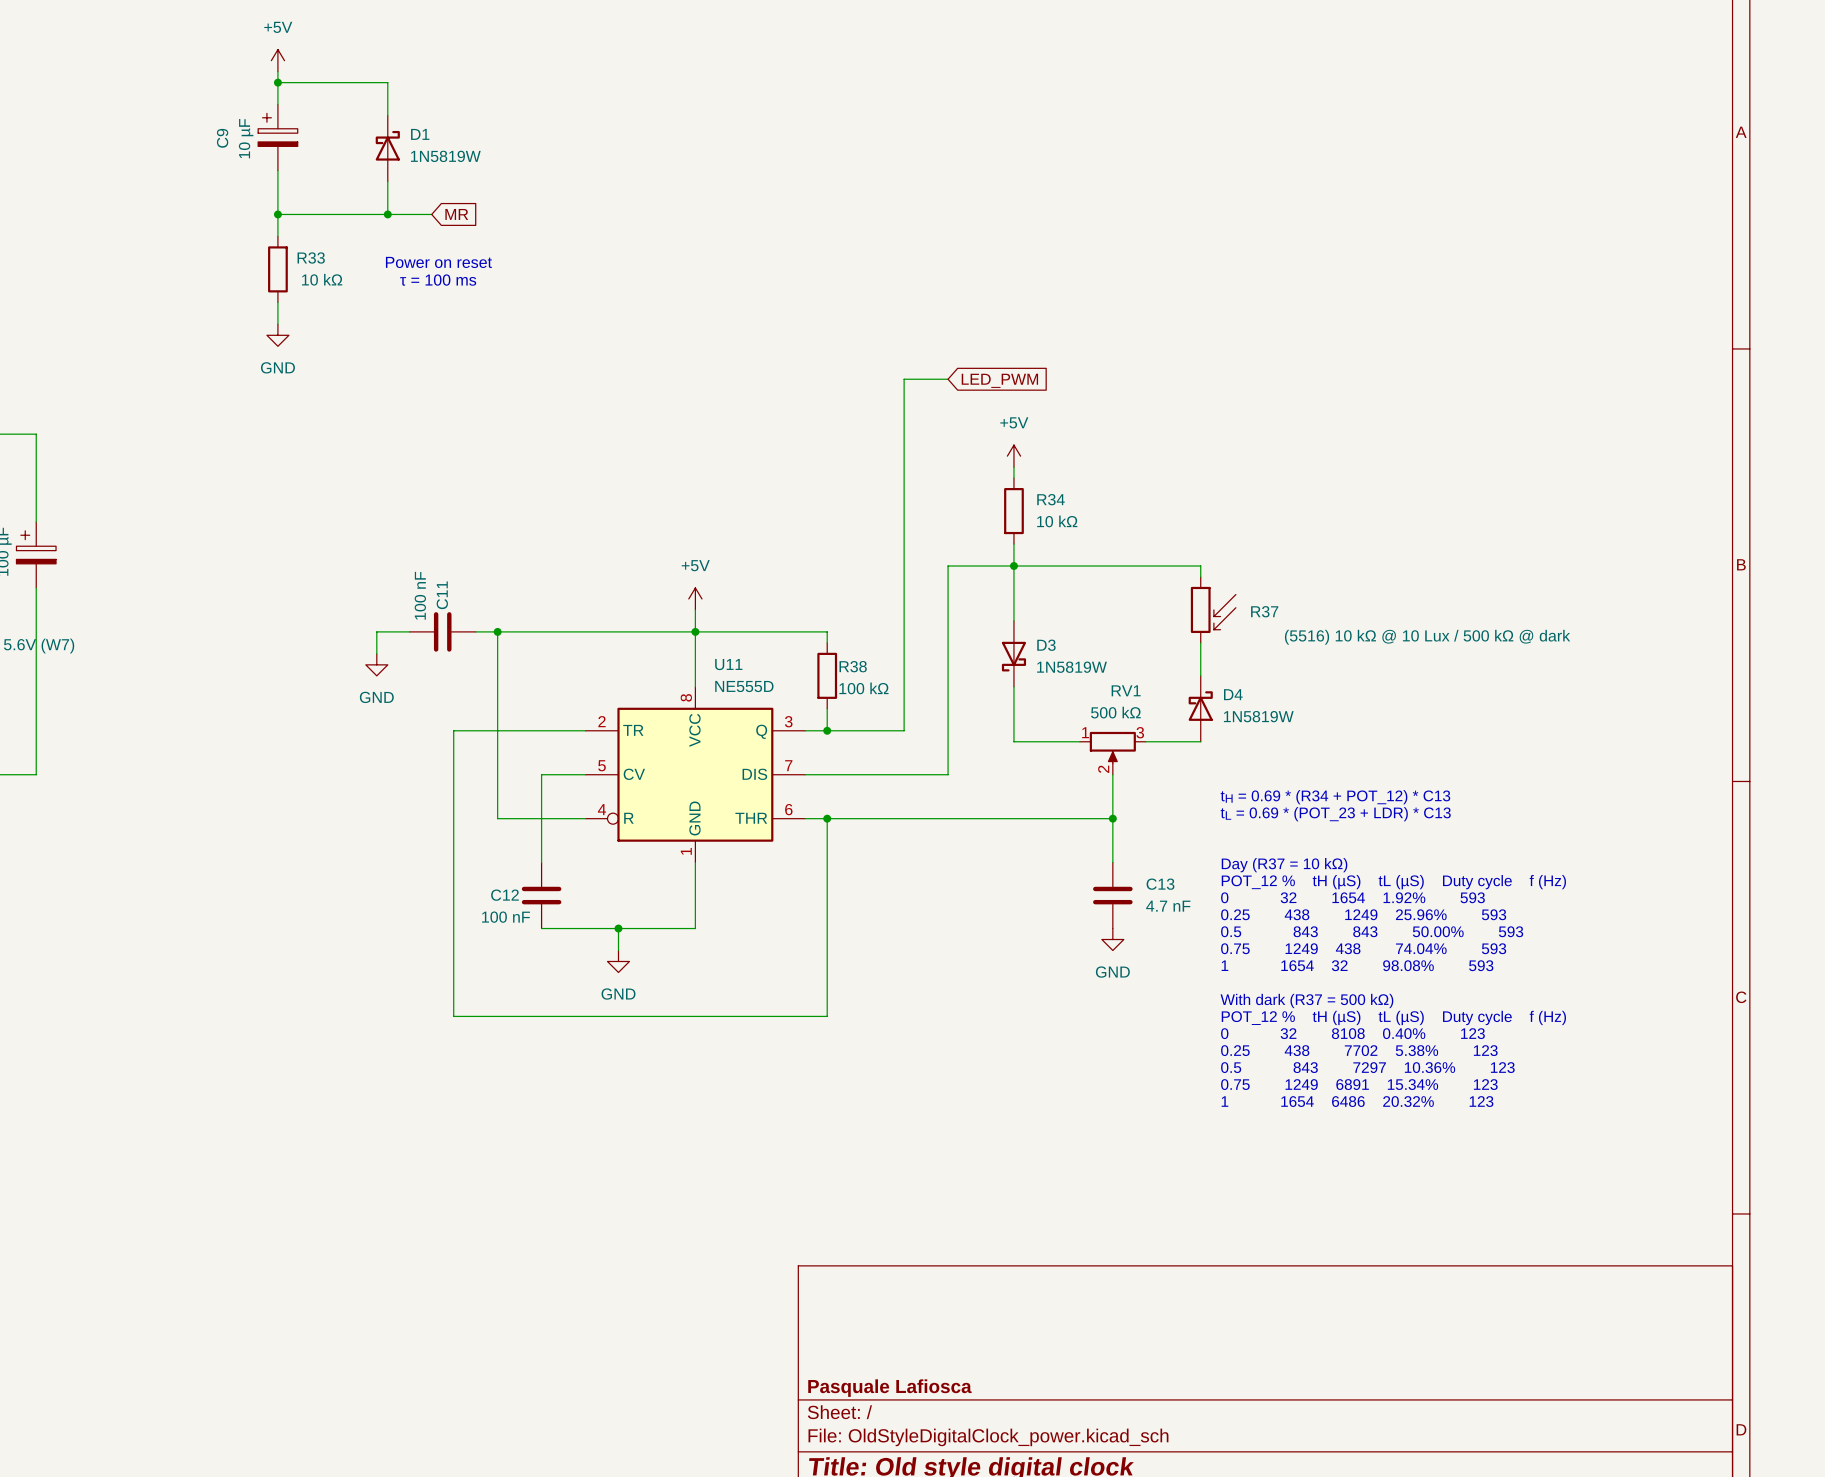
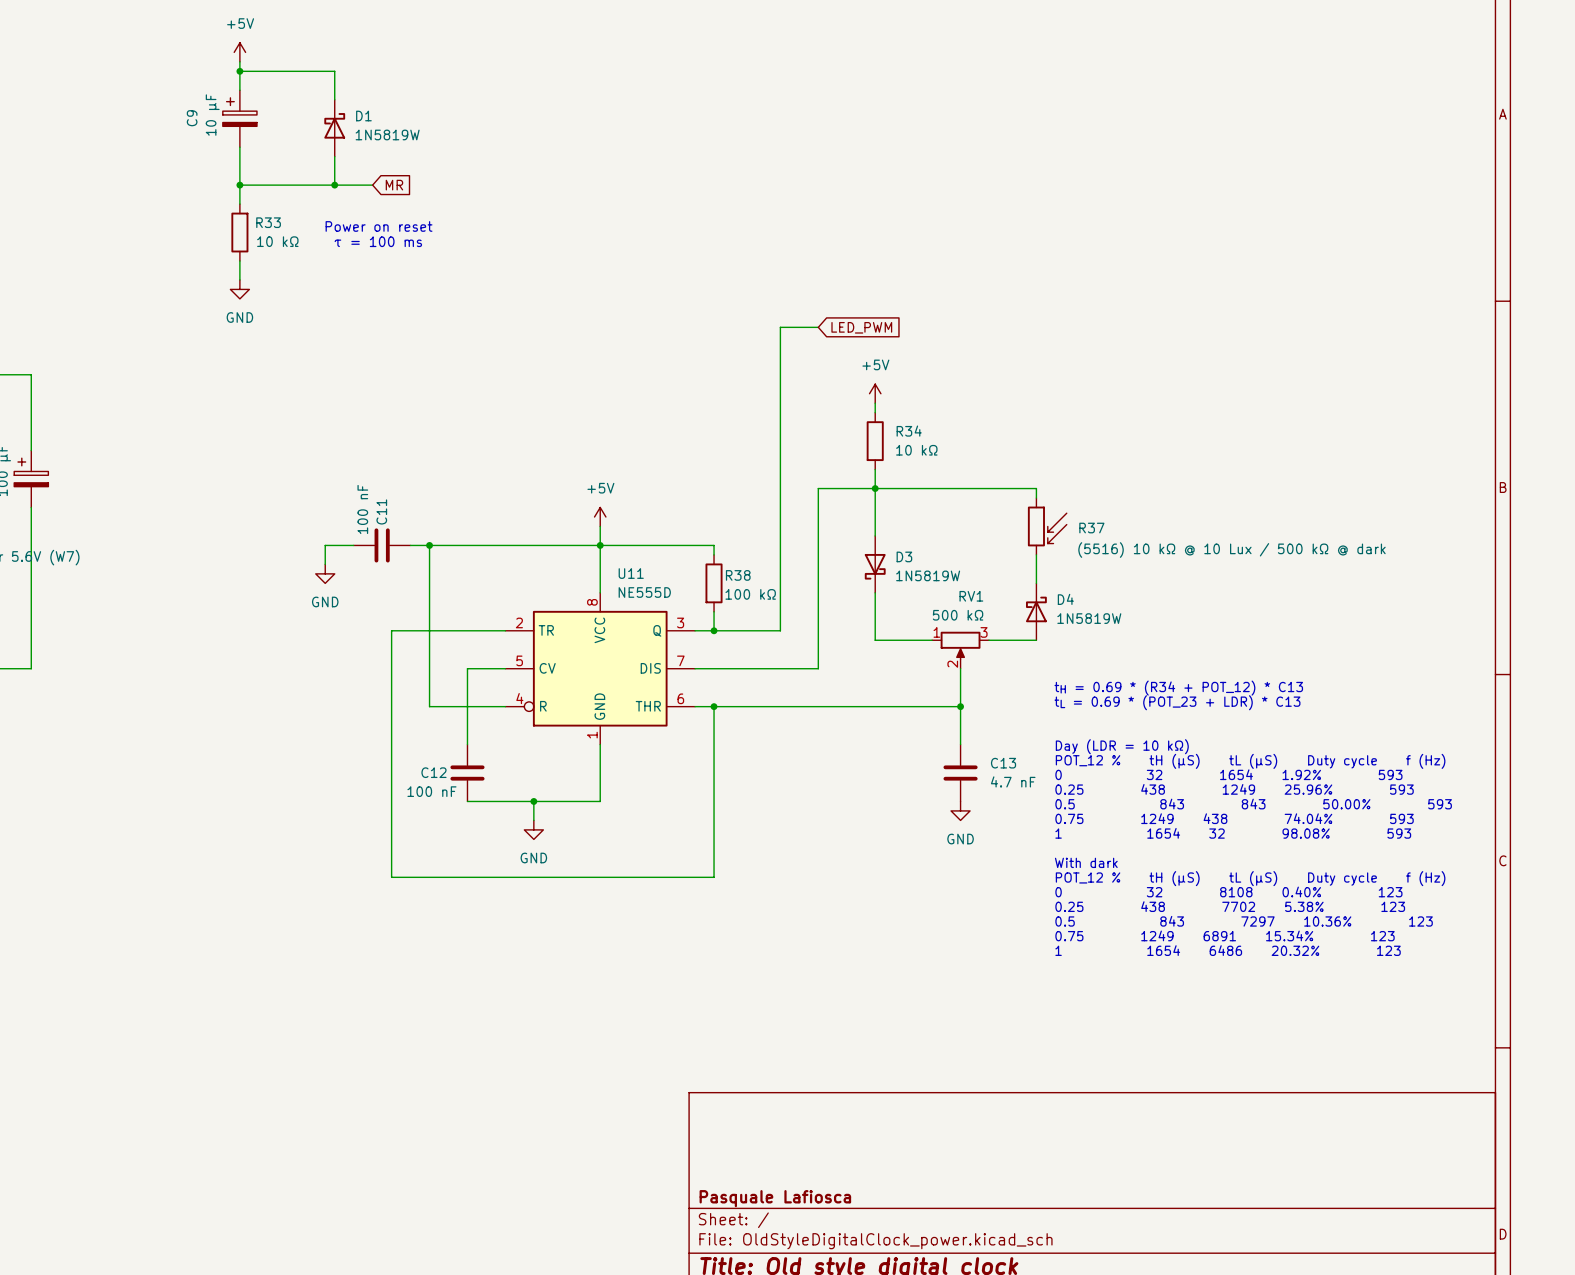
text: Day (R37 = 10 kΩ) (1284, 865) -> Day (LDR = 10 kΩ) (1122, 746)
text: With dark (R37 = 500 kΩ) (1306, 1000) -> With dark (1086, 862)

